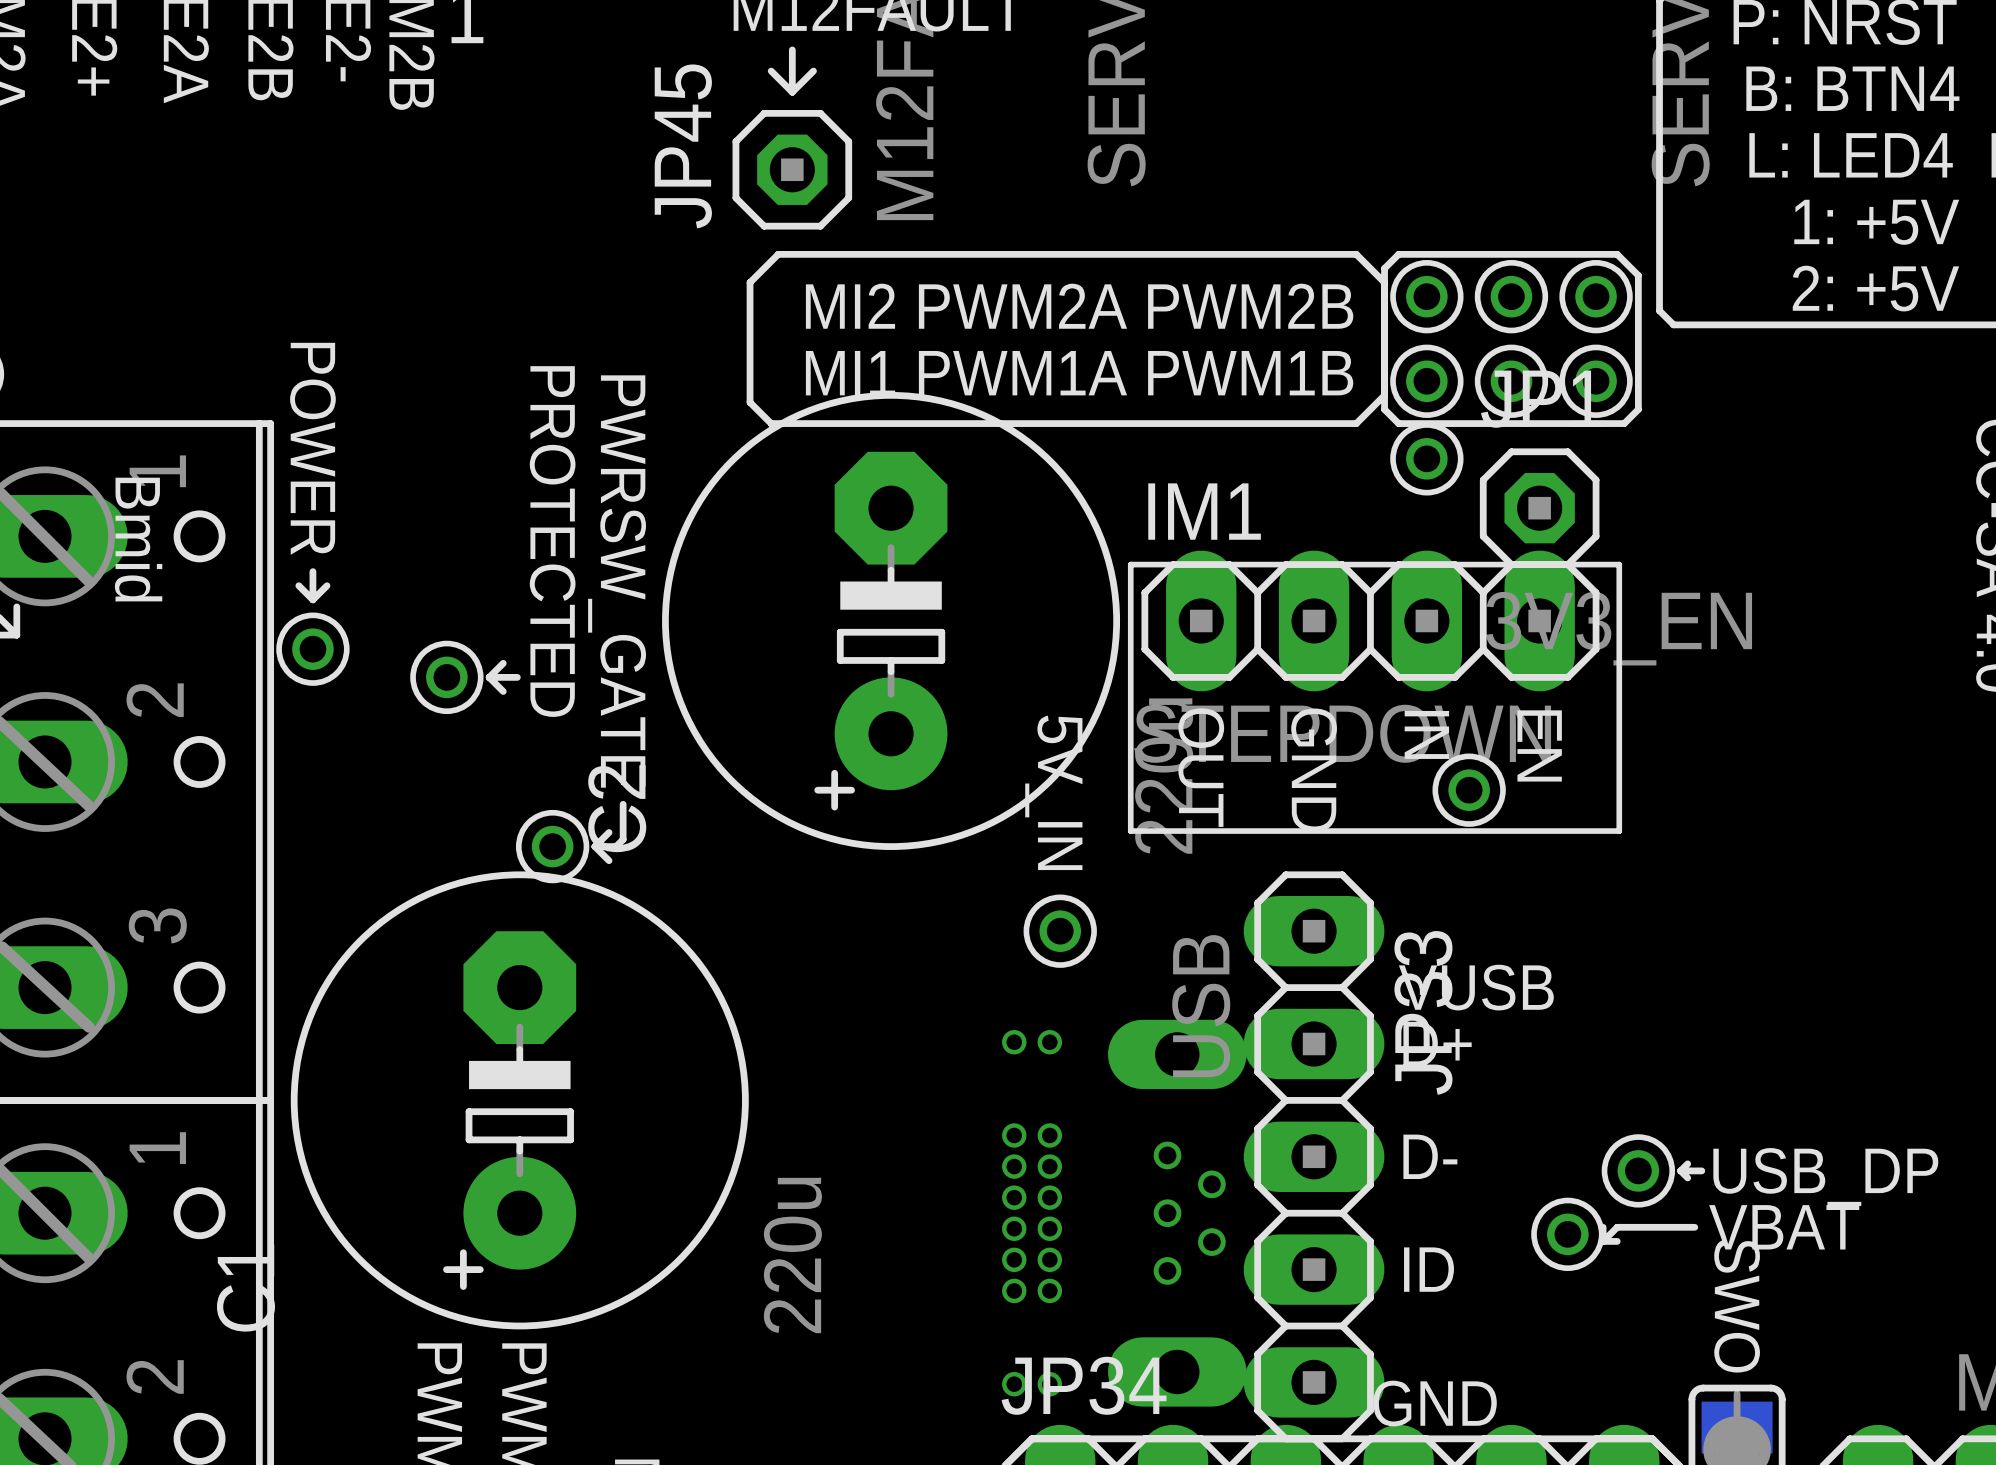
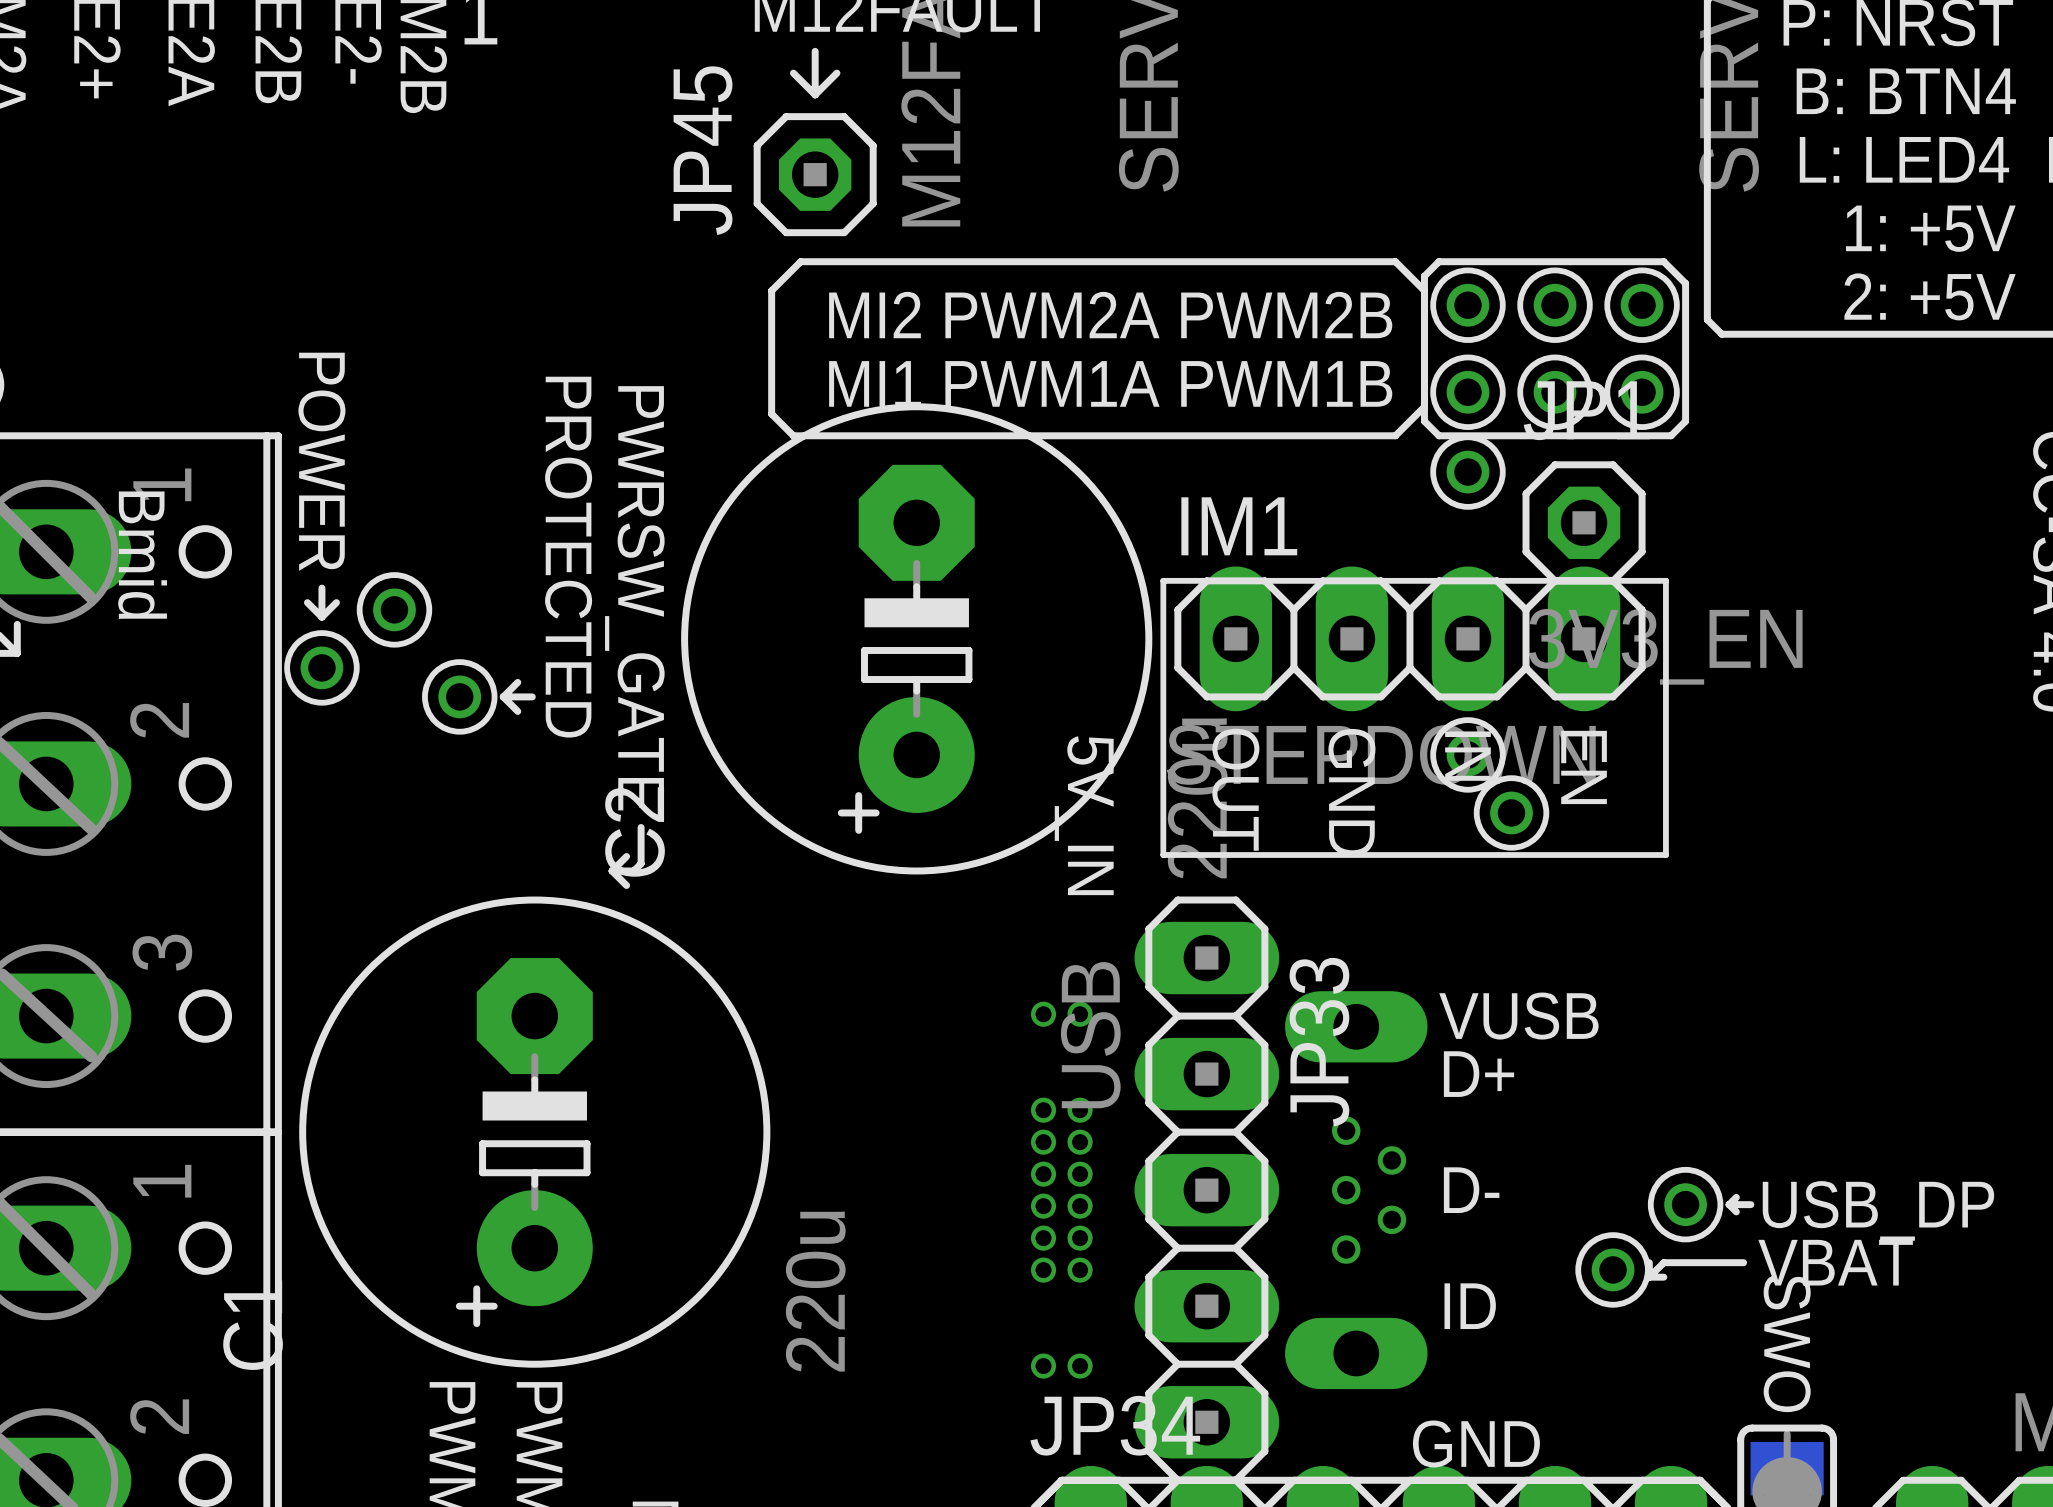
part: none -> (1467, 754)
part position: (552, 846) -> (394, 609)
part: (1060, 931) -> none
JP33 position: (1314, 1156) -> (1206, 1190)
part position: (1032, 1213) -> (1061, 1190)
part position: (1177, 1213) -> (1356, 1190)

